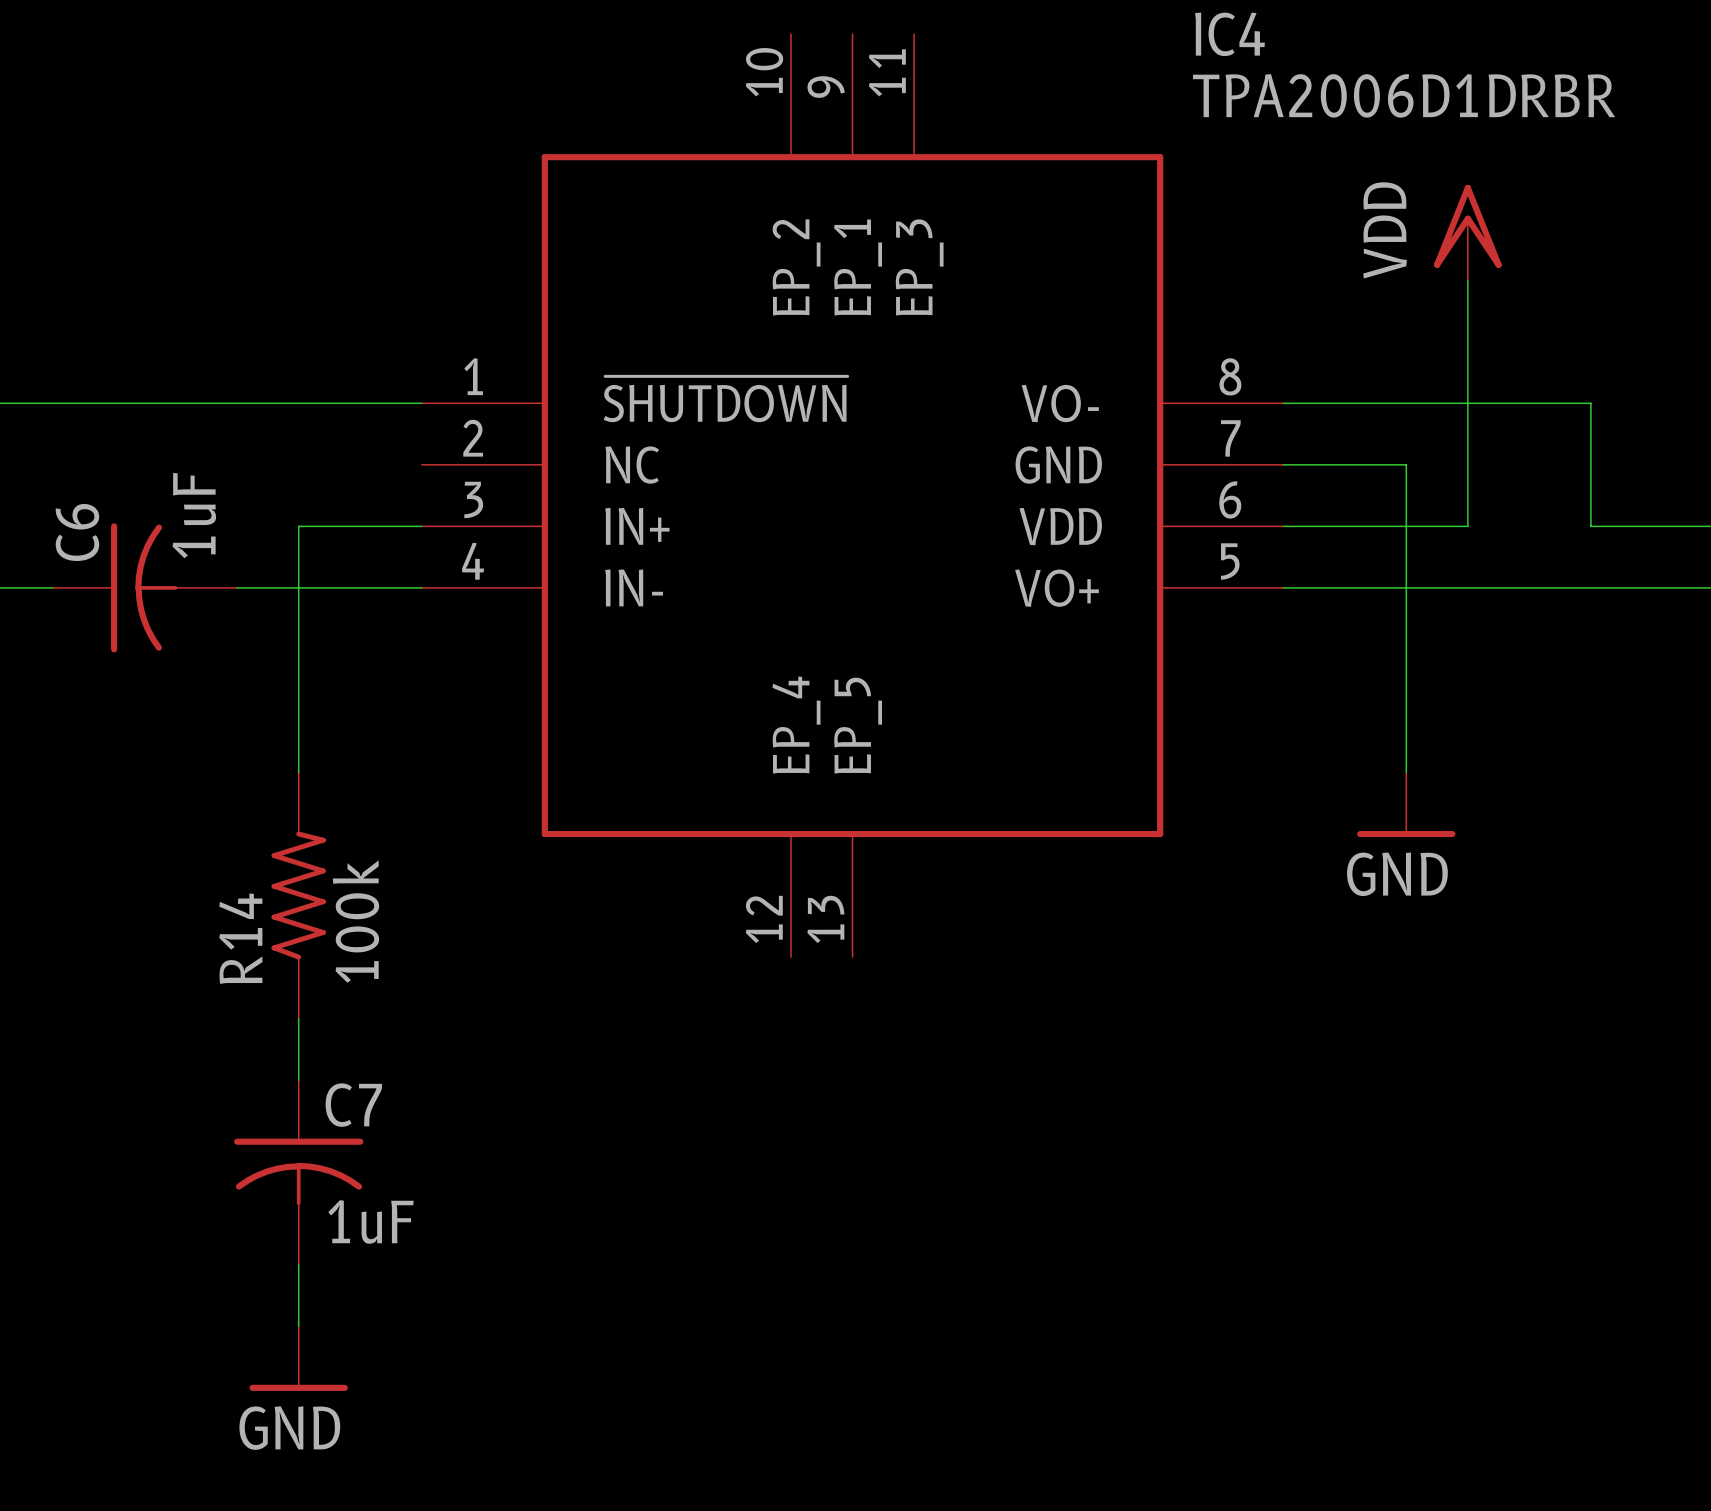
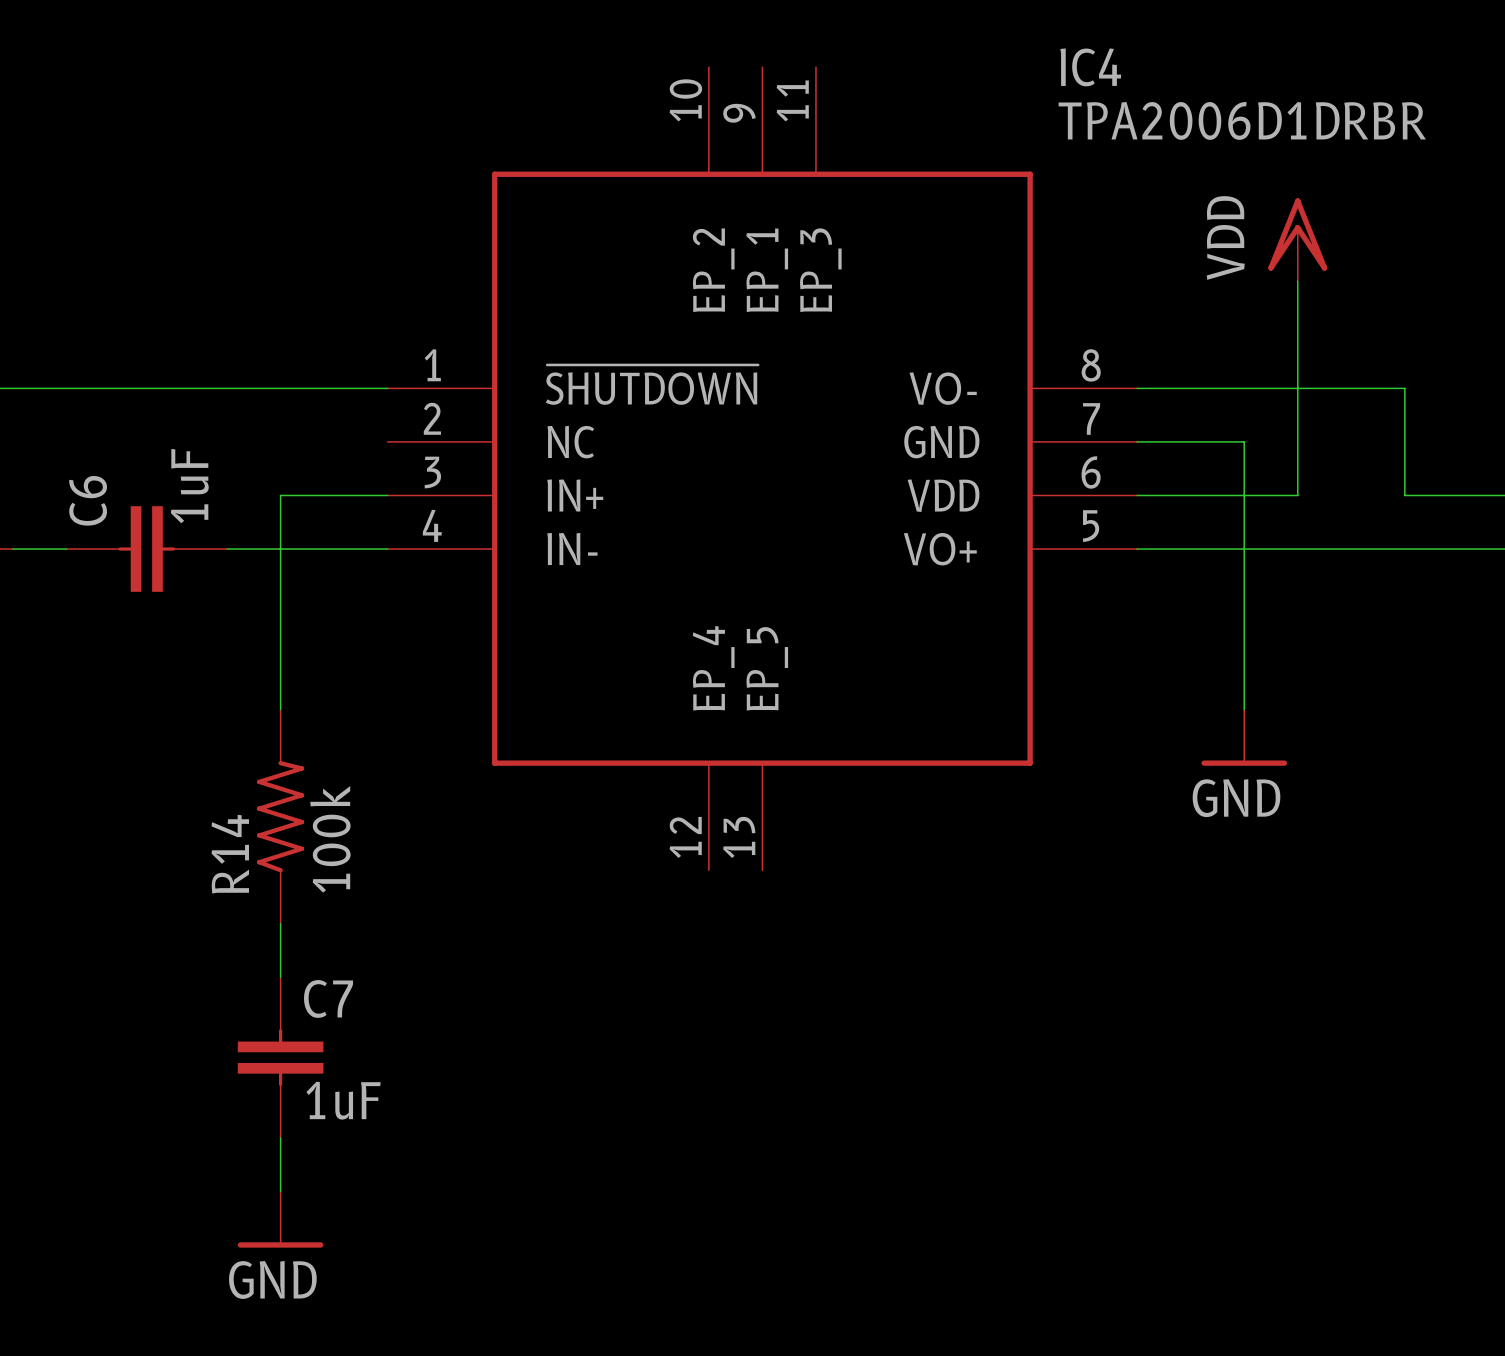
C6 symbol: [52, 523, 238, 653] -> [66, 506, 228, 592]
C7 symbol: [234, 1080, 364, 1265] -> [237, 977, 324, 1138]

